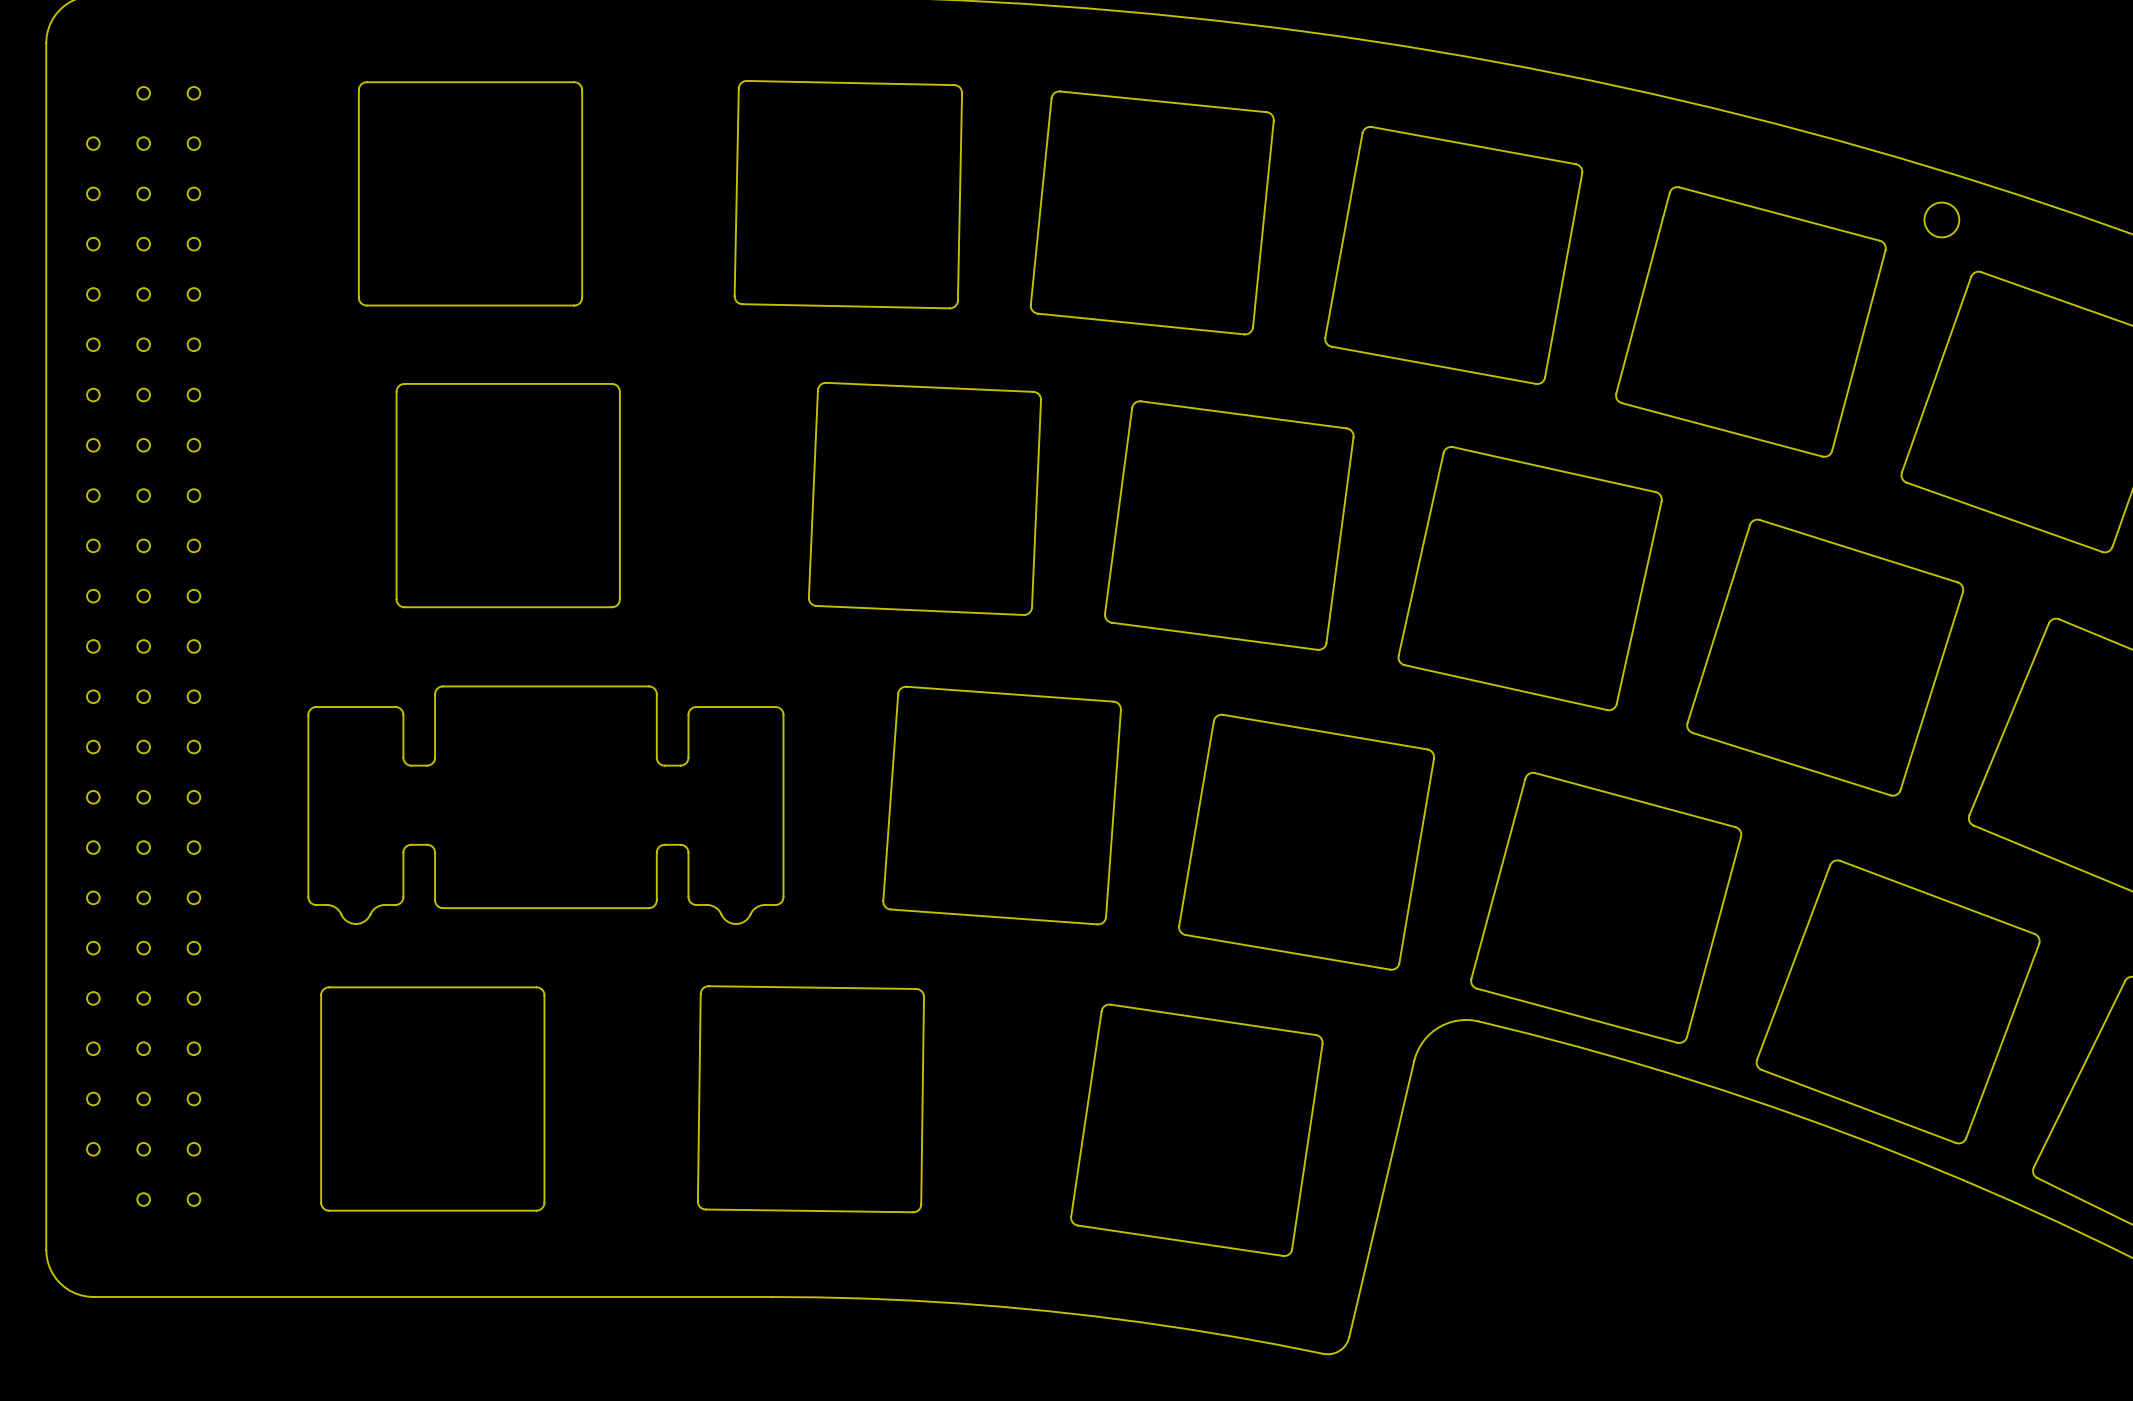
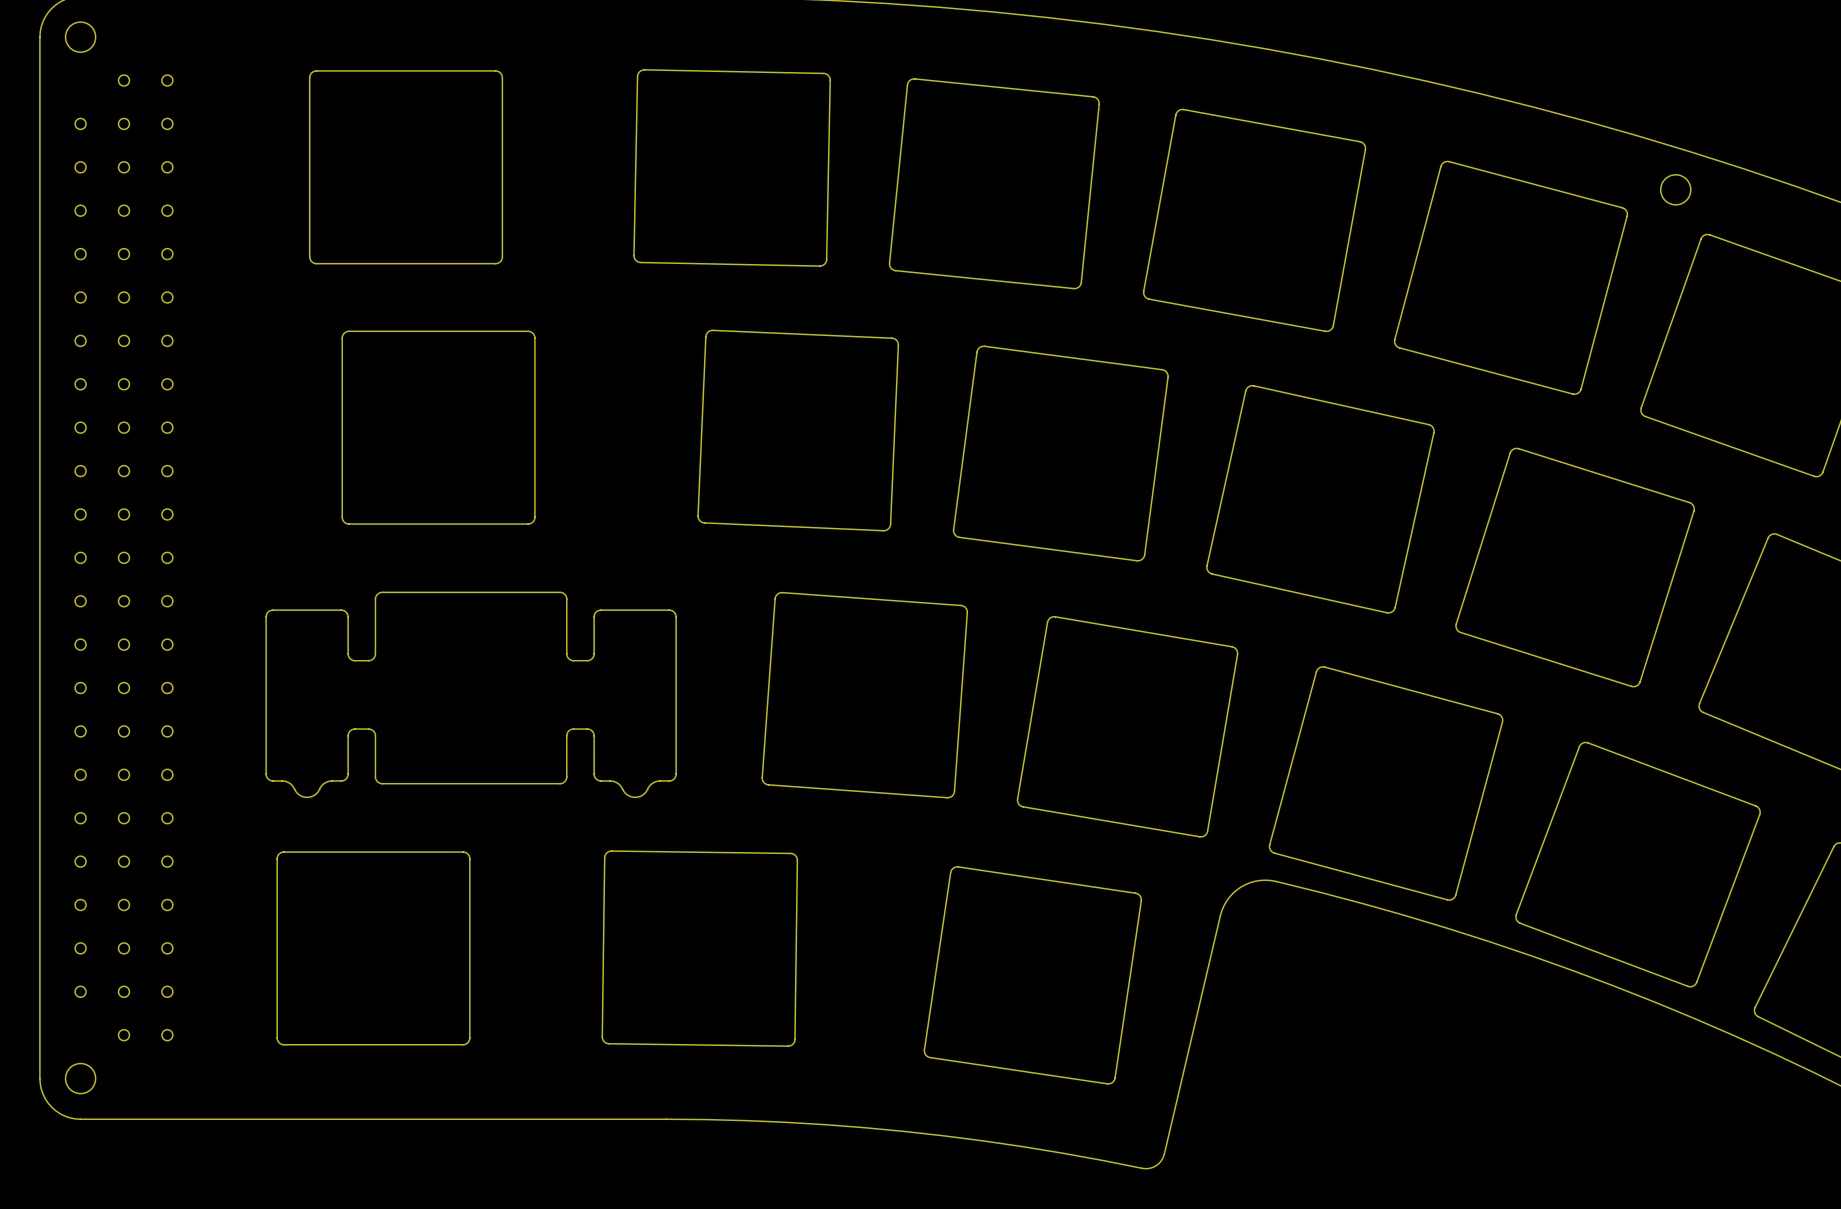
round board edge: none -> [64, 21, 97, 53]
round board edge: none -> [64, 1062, 97, 1095]

